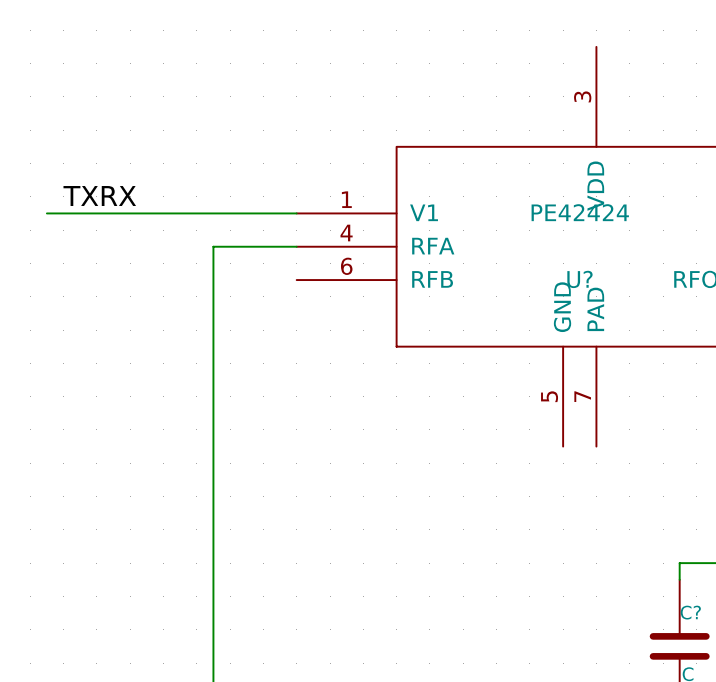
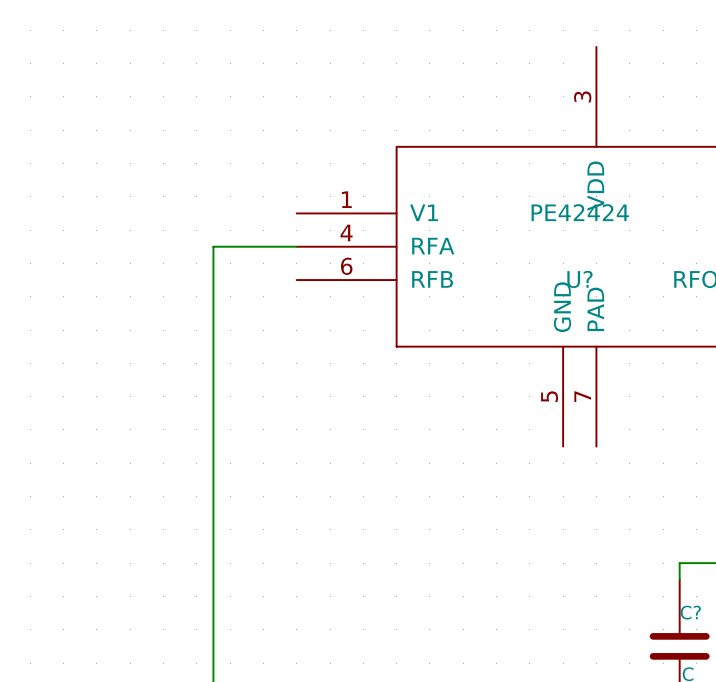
label: TXRX (99, 196) -> none
wire: (46, 213) (296, 213) -> none

